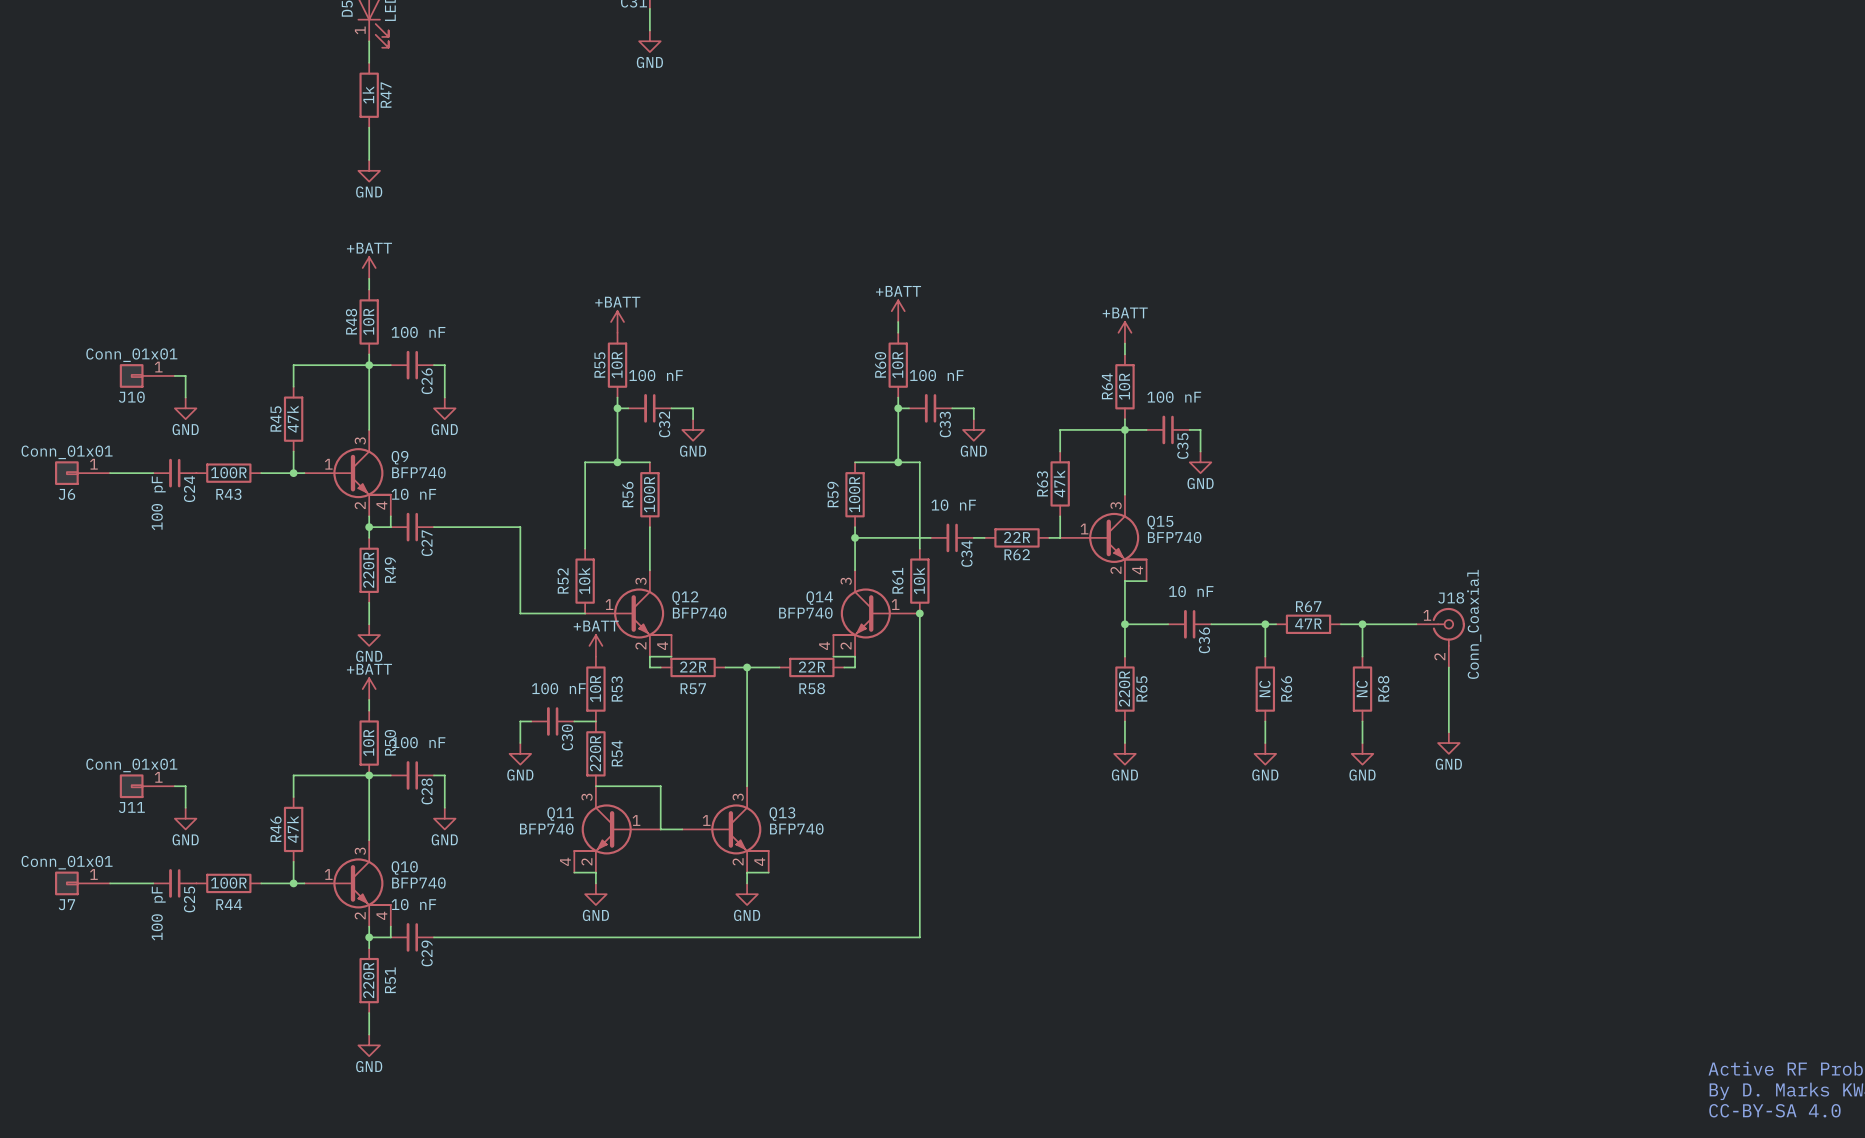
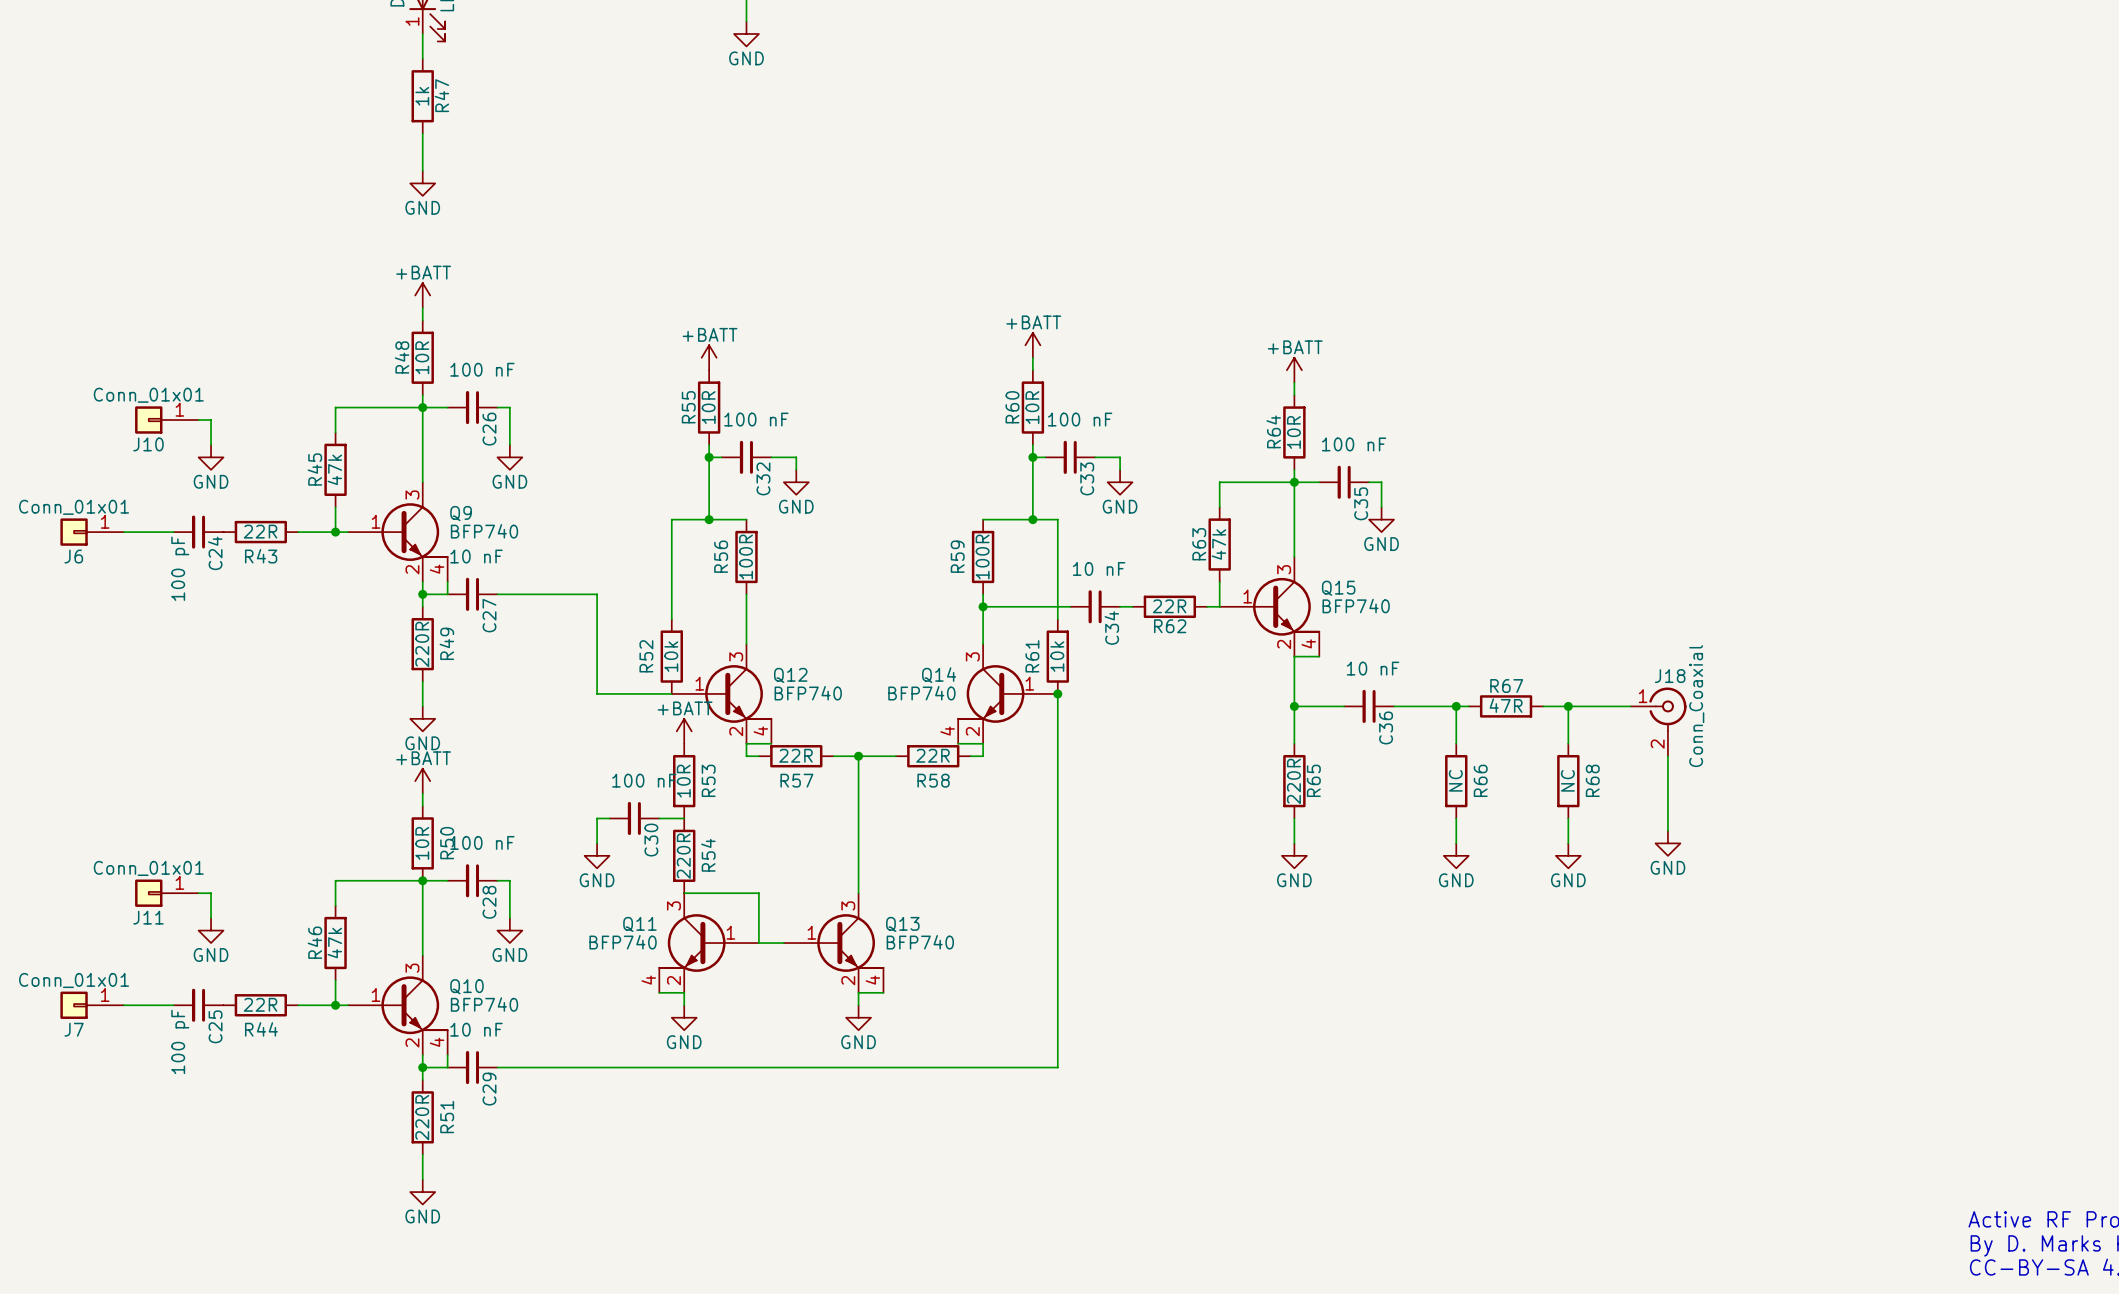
R43 value: 100R (228, 472) -> 22R (260, 531)
R44 value: 100R (228, 883) -> 22R (260, 1004)

